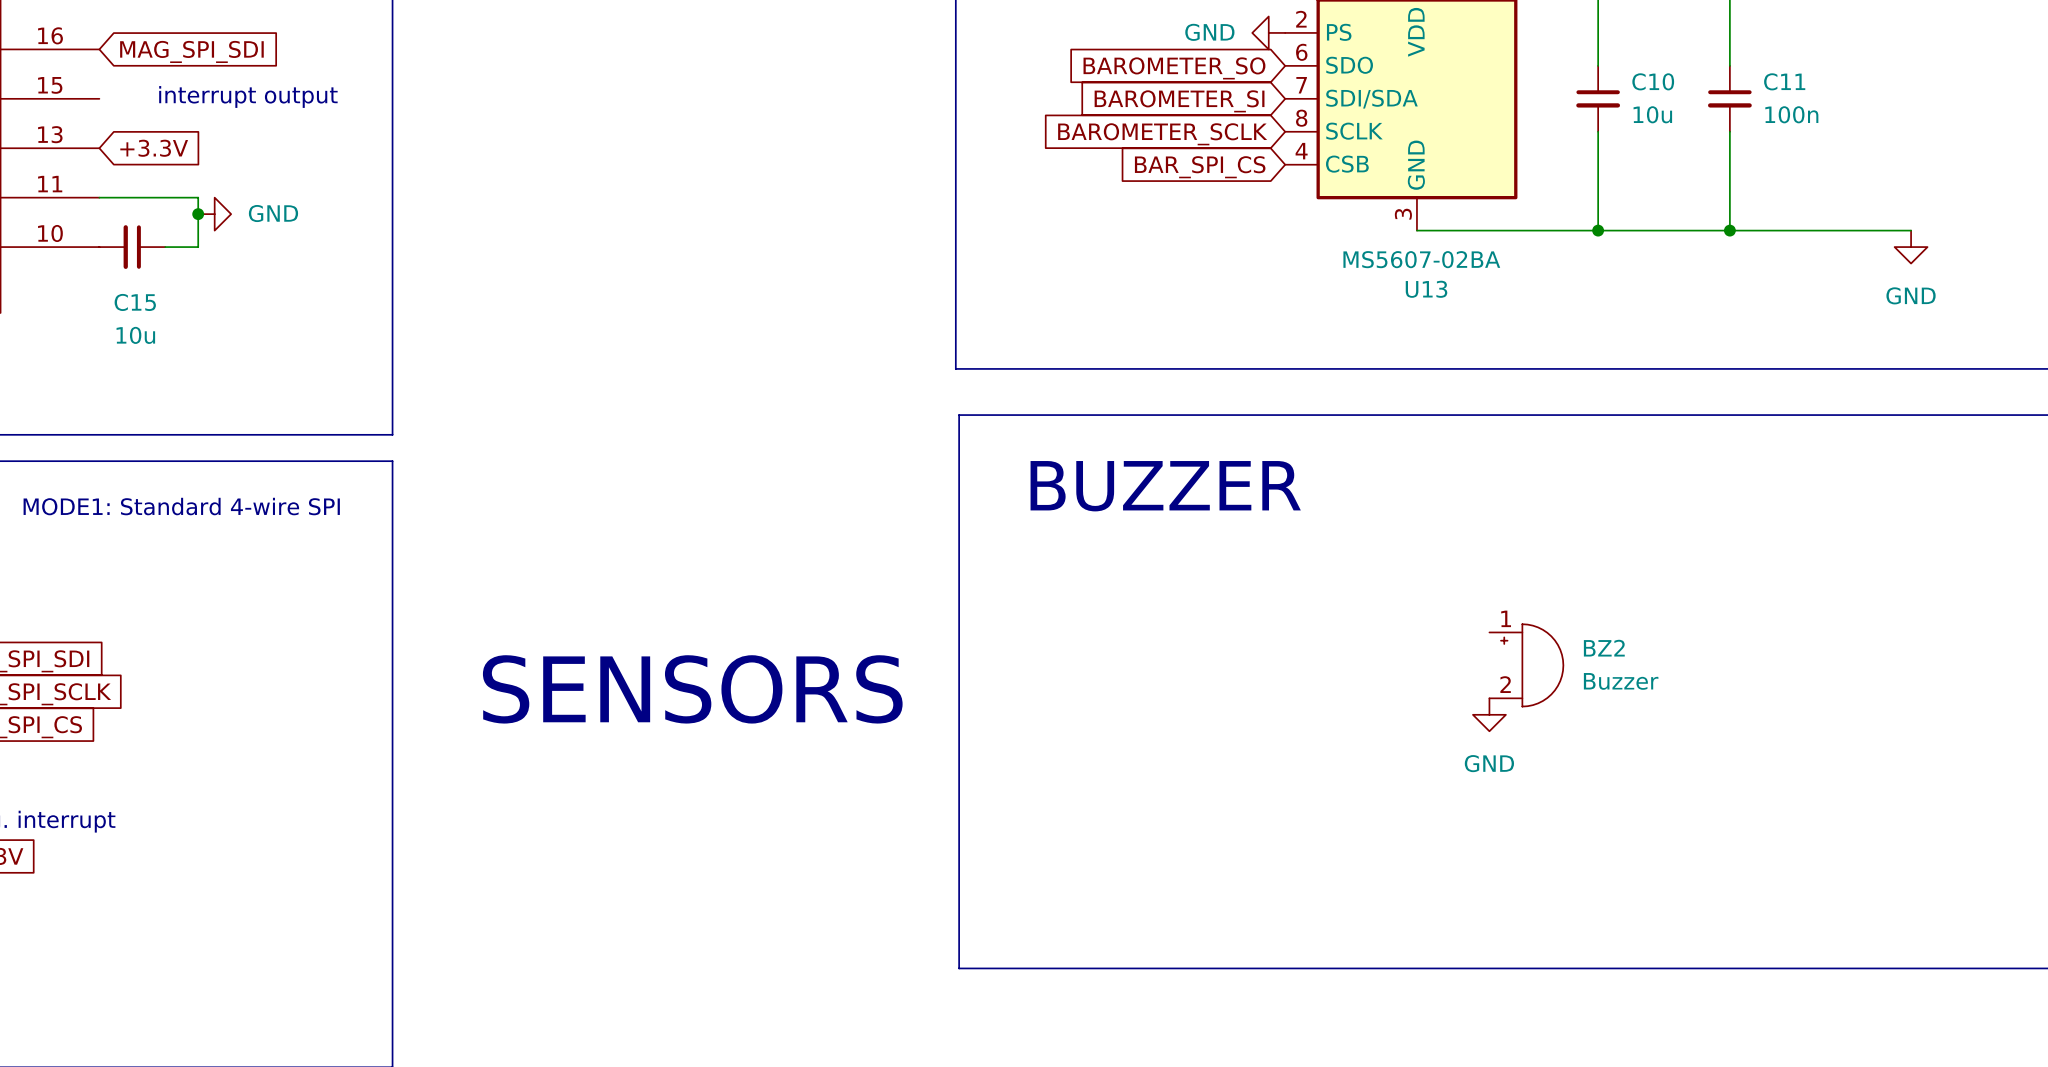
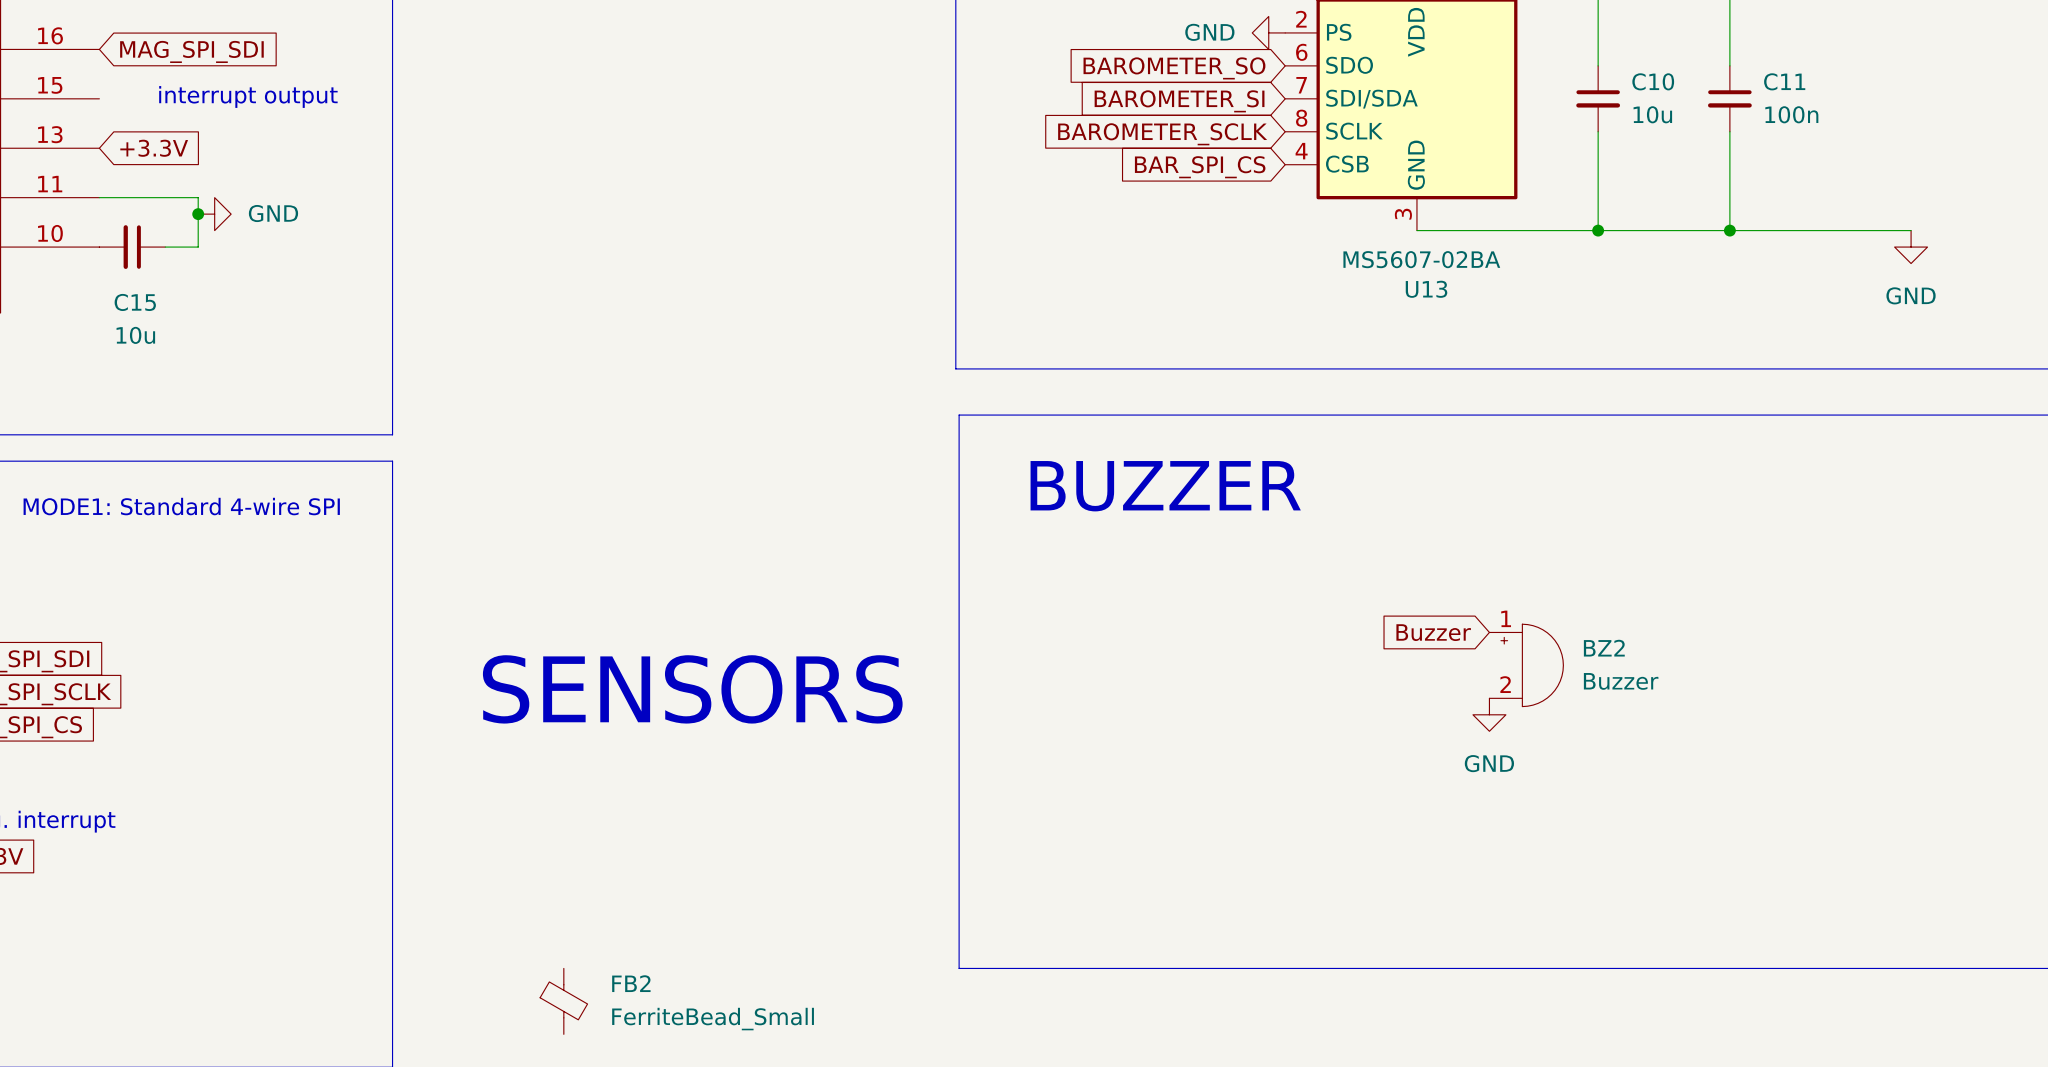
global label: none -> Buzzer (1433, 632)
FB2: none -> FerriteBead_Small (563, 1001)

